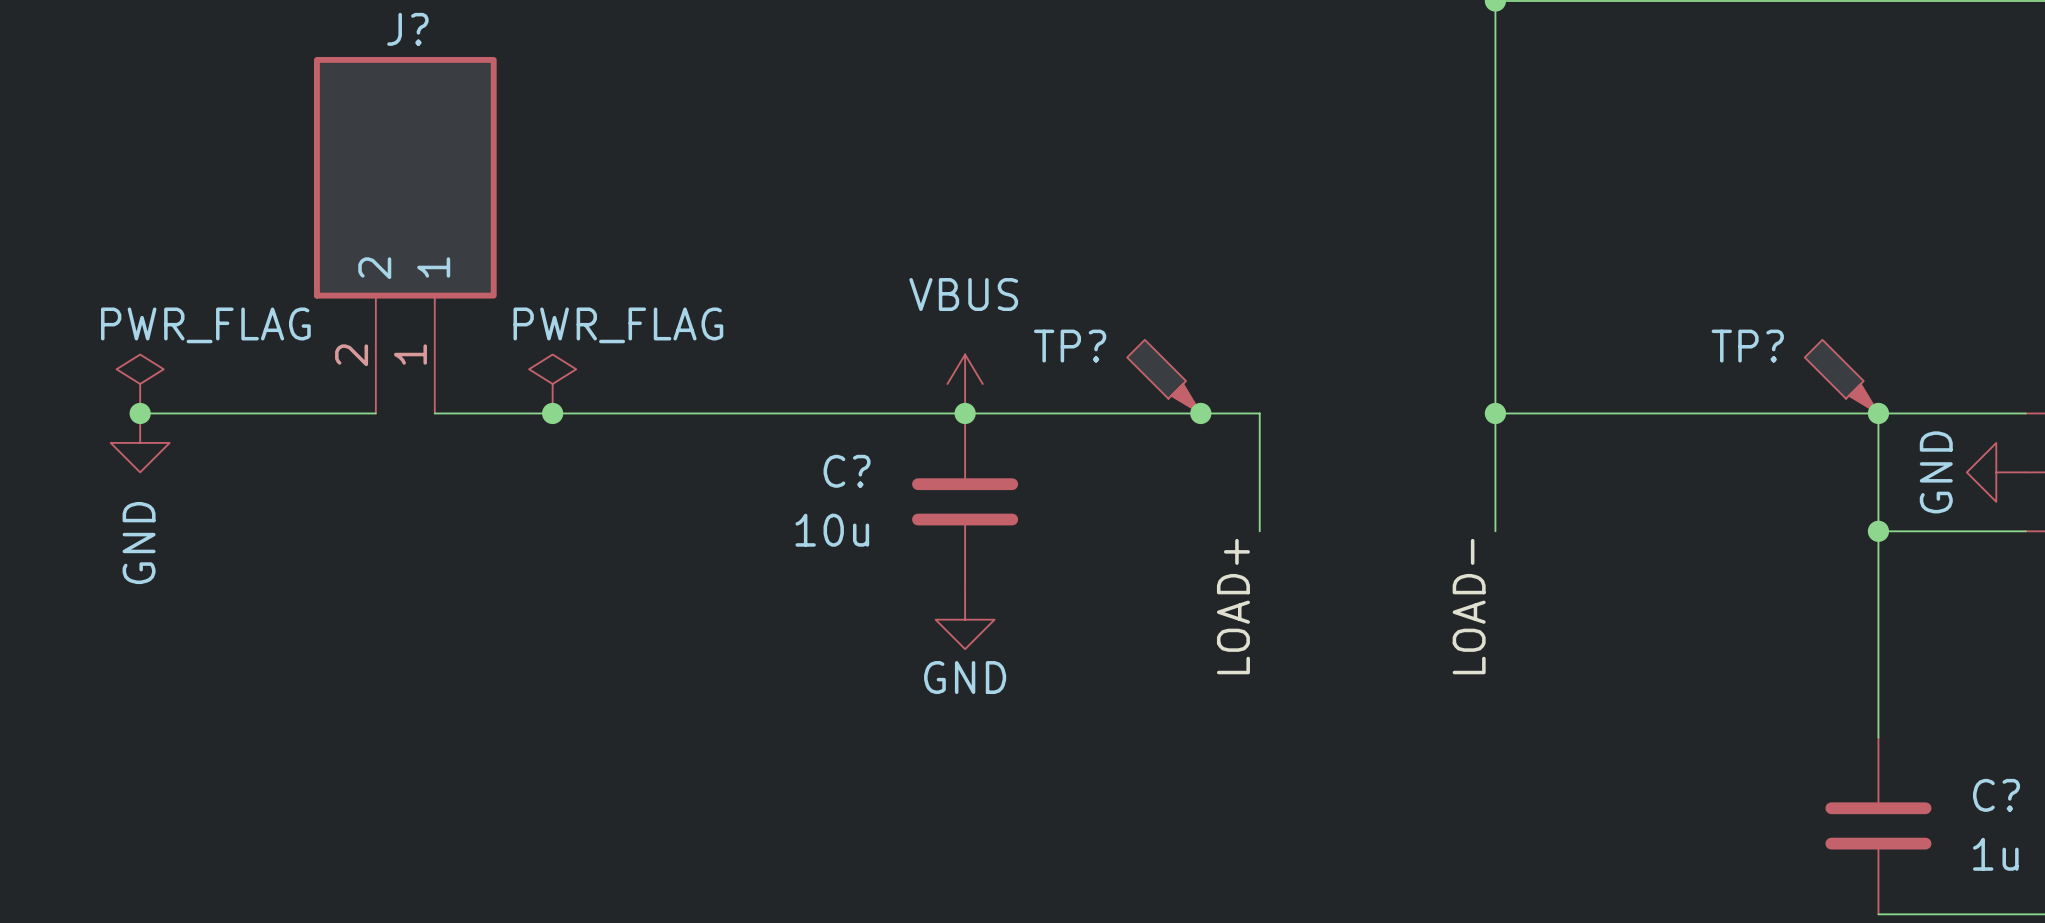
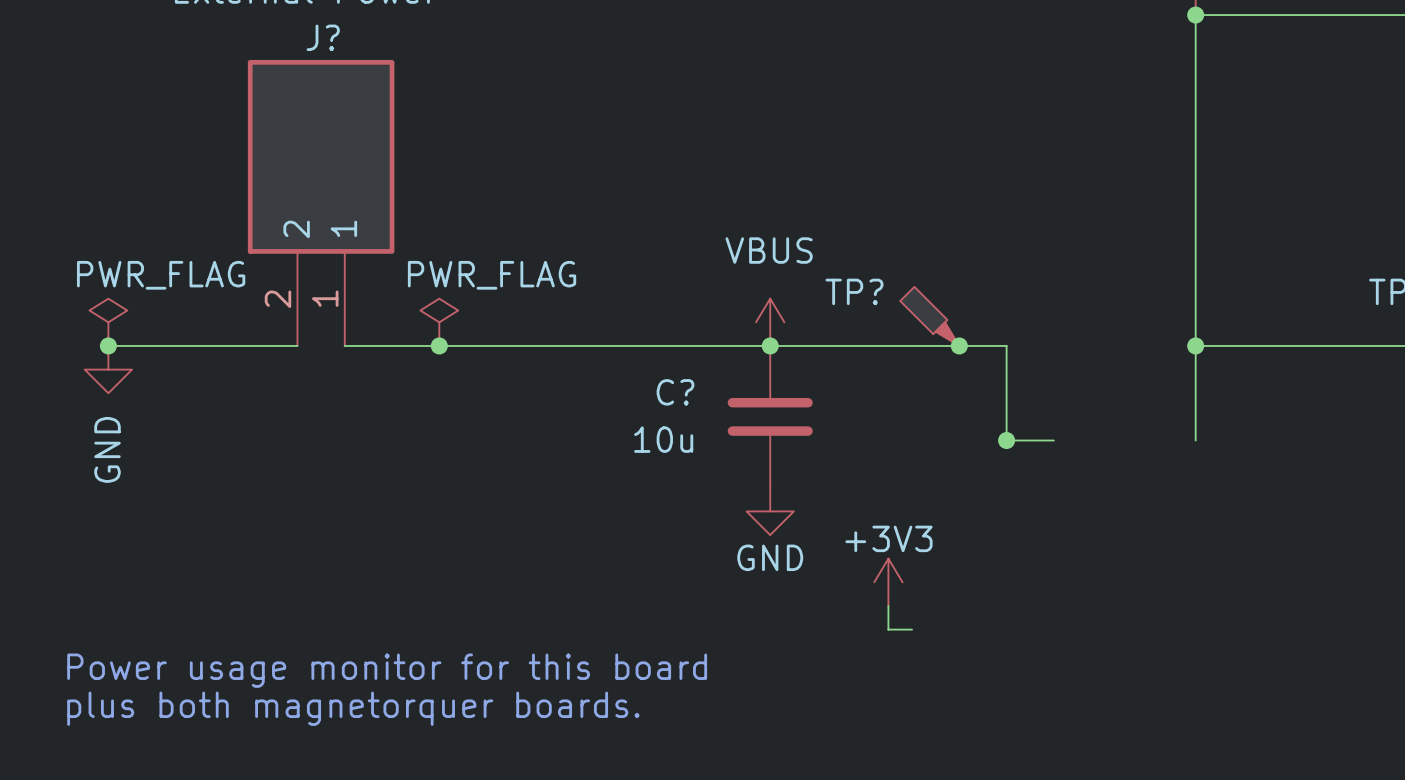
wire: none -> (1006, 440) (1053, 440)
junction: none -> (1006, 440)
label: LOAD+ (1233, 606) -> none
label: LOAD- (1469, 606) -> none
power symbol: none -> +3V3 (888, 582)
wire: none -> (888, 605) (888, 629) (912, 629)
text: none -> Power usage monitor for this board (387, 670)
text: none -> plus both magnetorquer boards. (353, 708)

